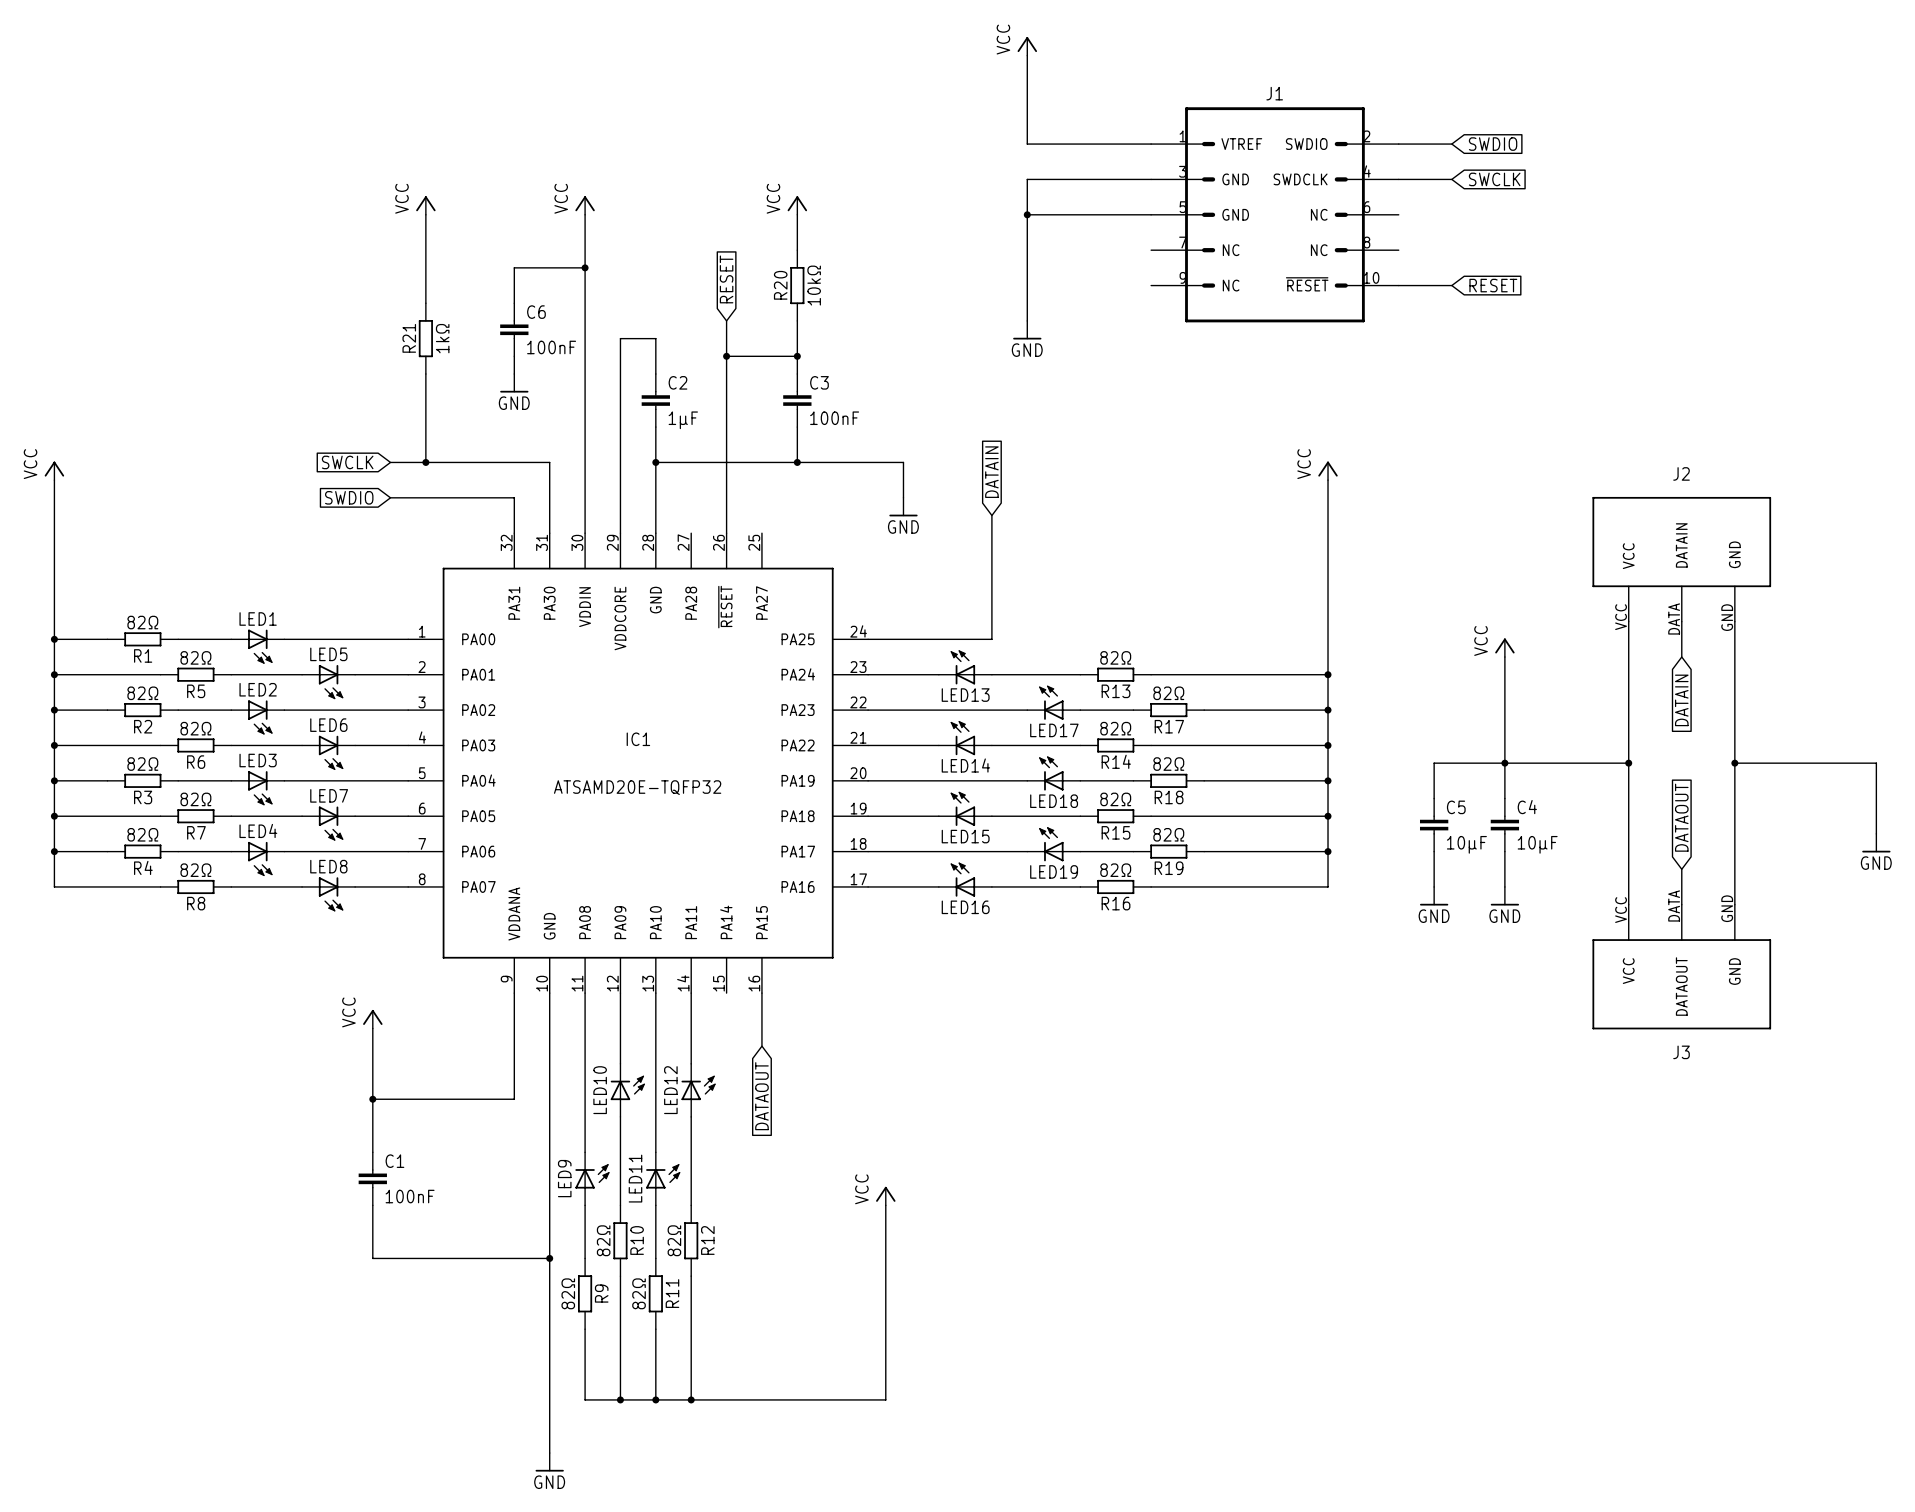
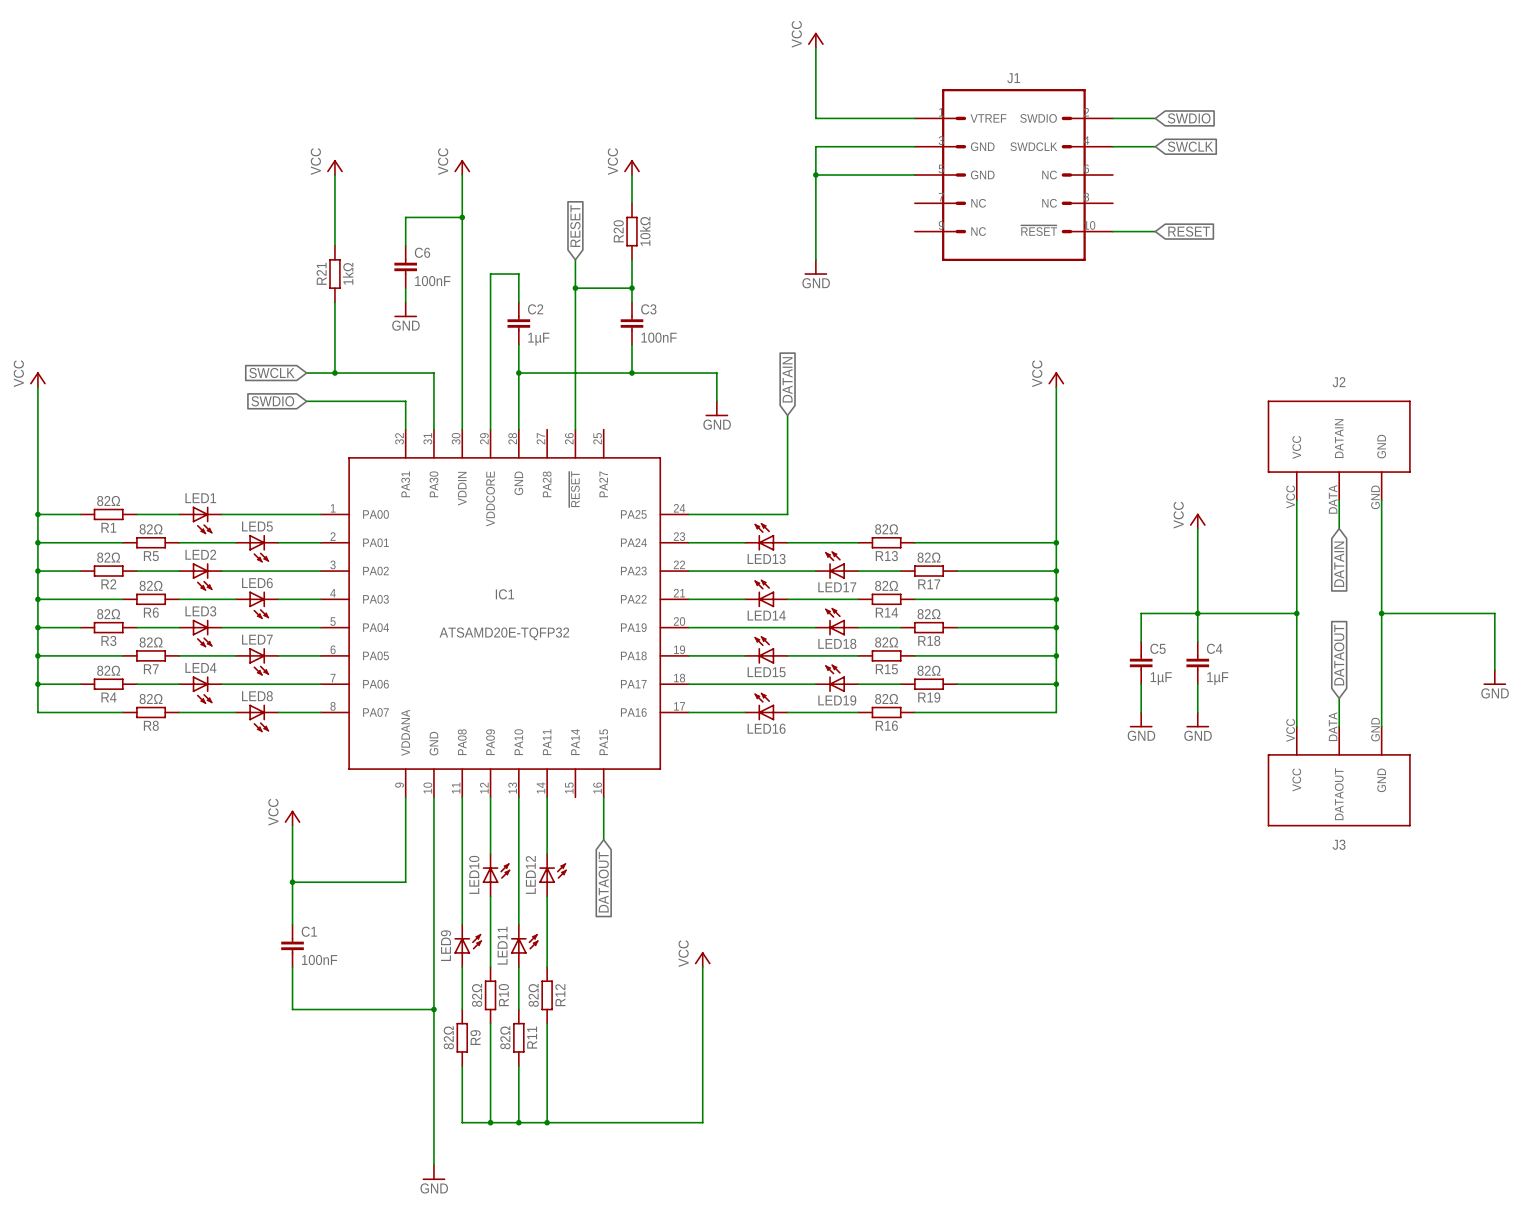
C5 value: 10µF (1466, 844) -> 1µF (1161, 678)
C4 value: 10µF (1537, 844) -> 1µF (1217, 678)

